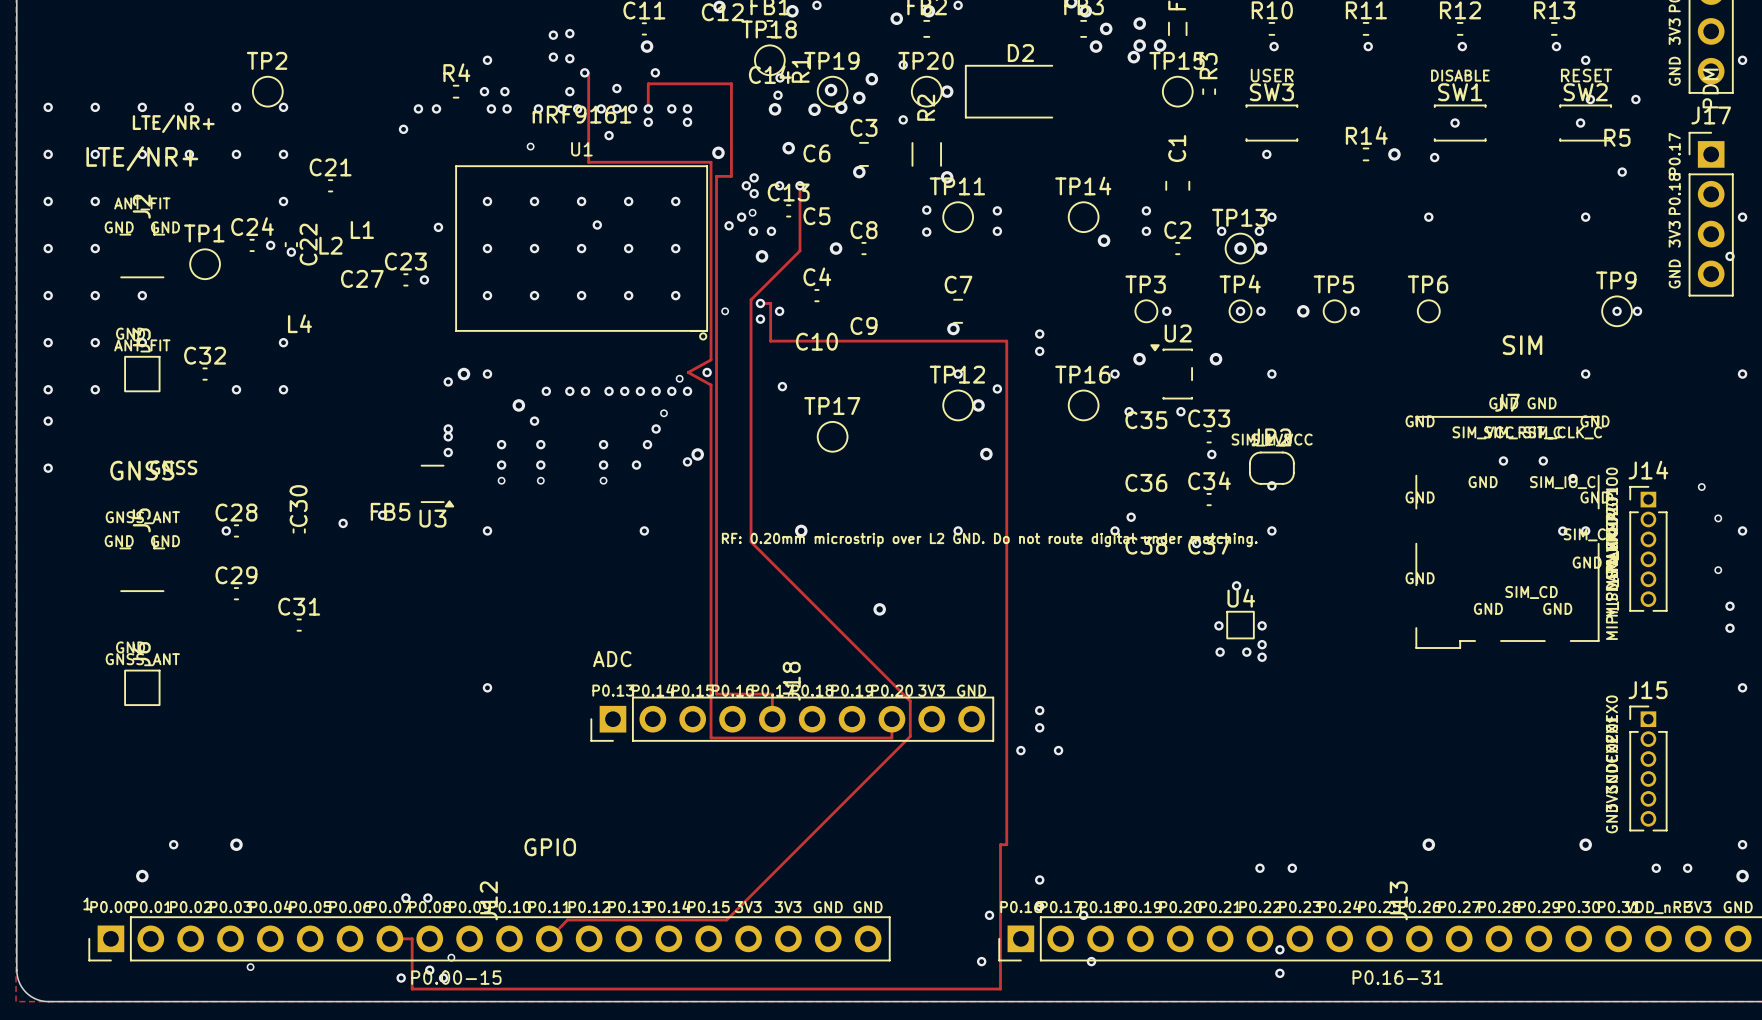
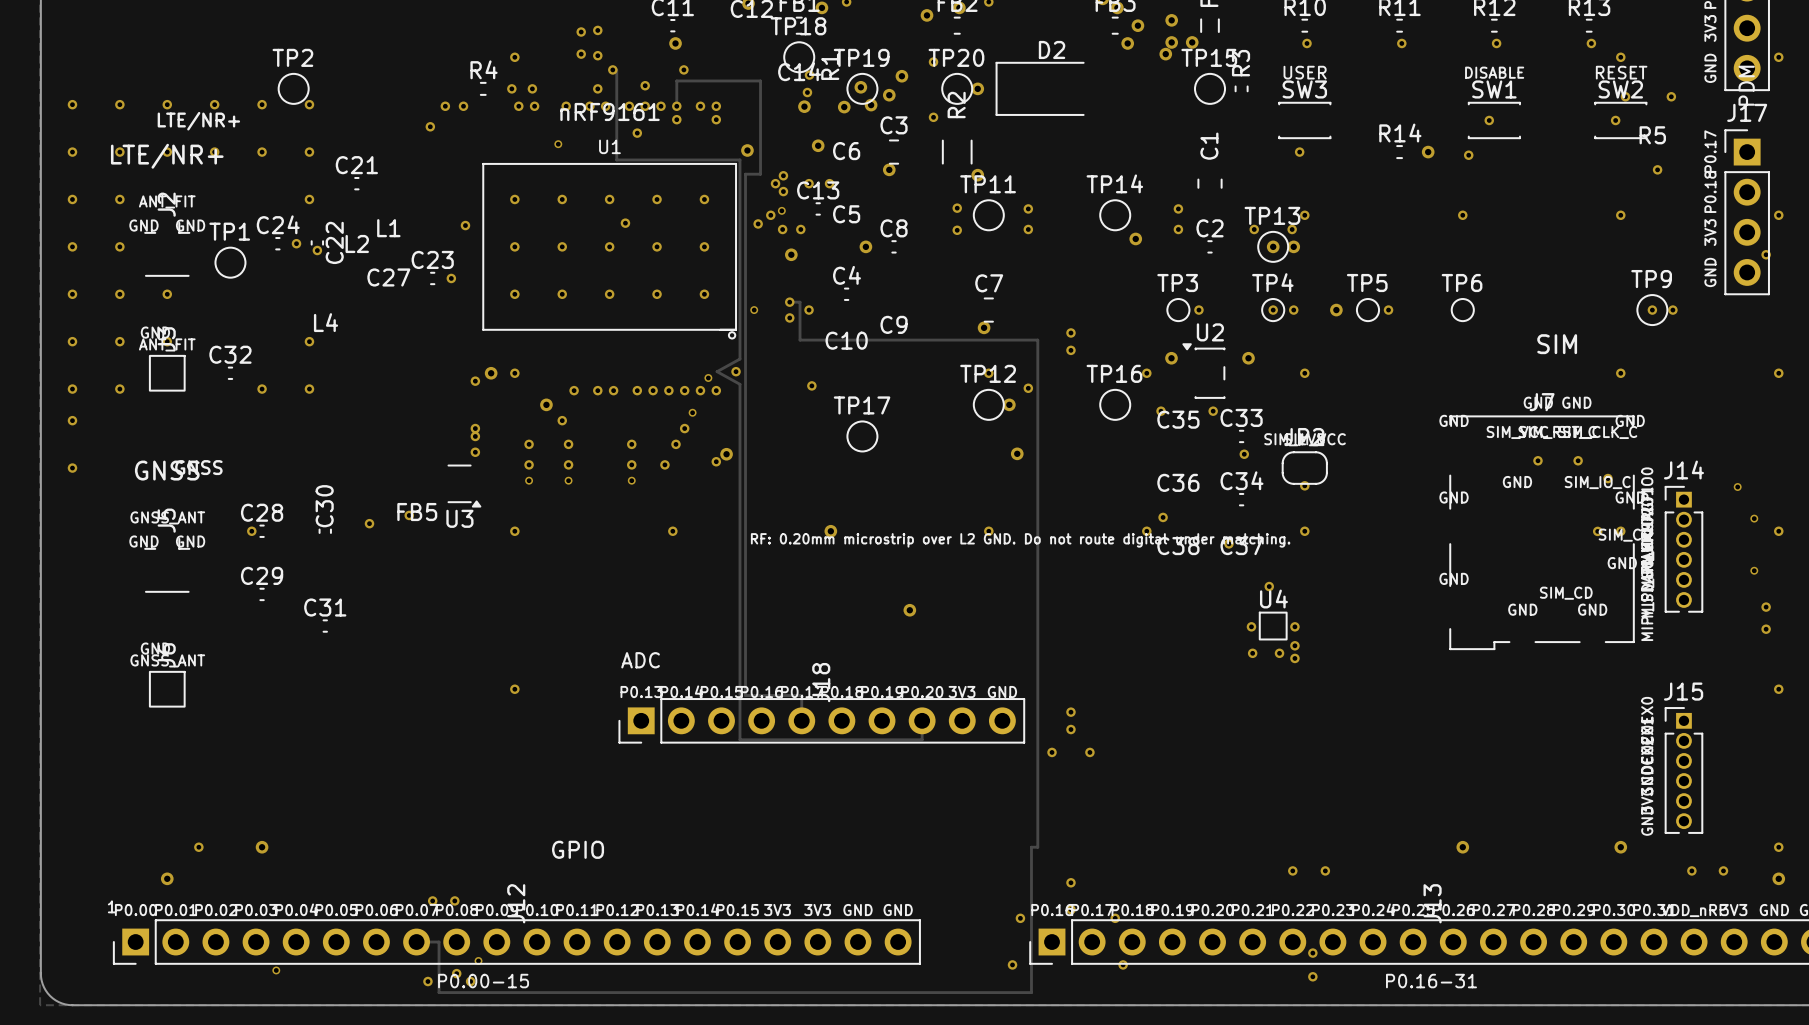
track: (799, 185) (799, 250) (751, 299) (751, 541) (910, 701) (910, 736) (726, 920) (567, 920) (549, 938) -> none

